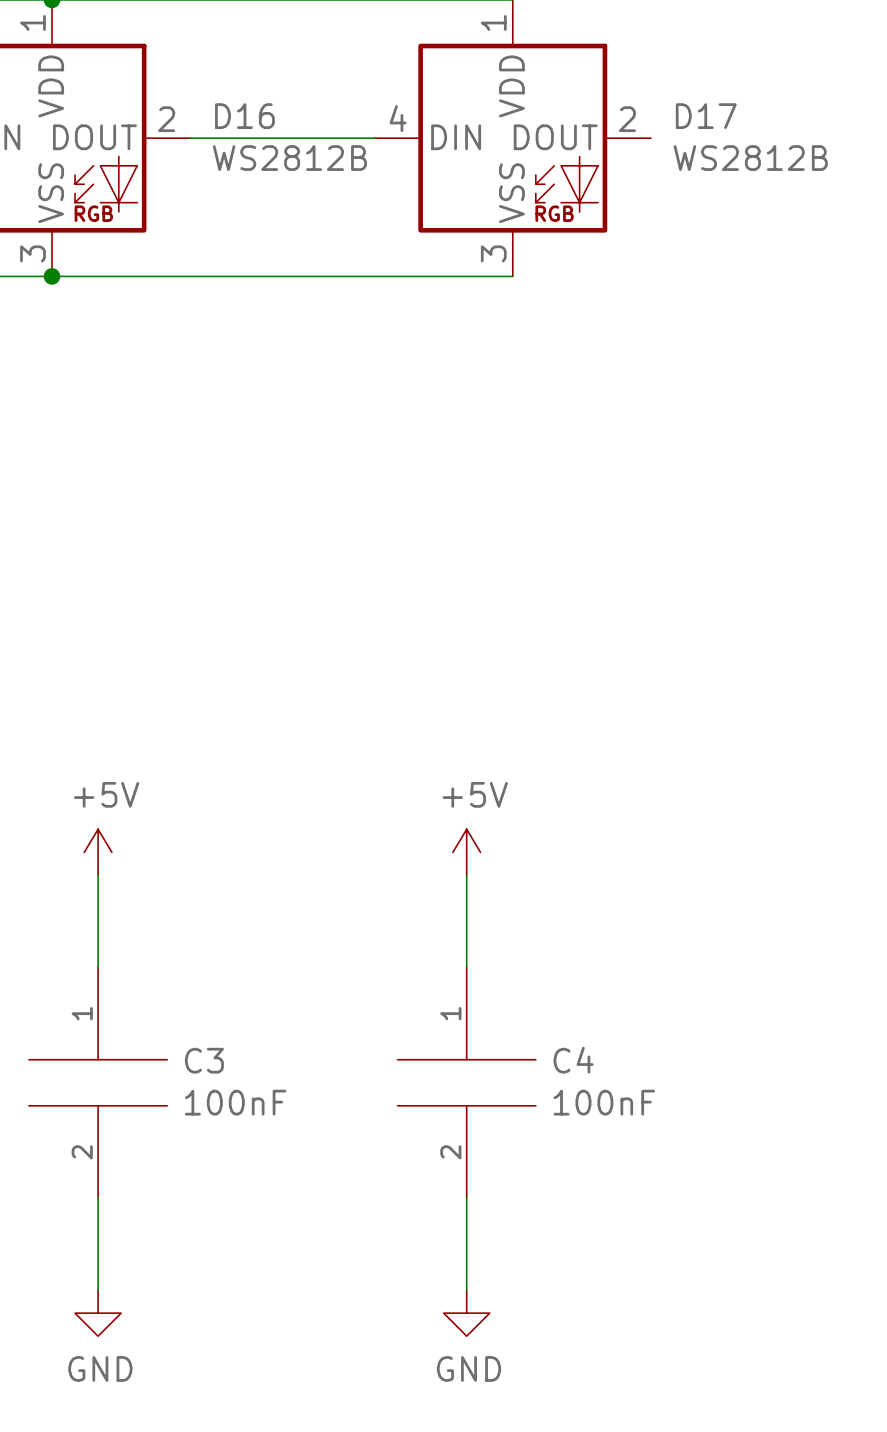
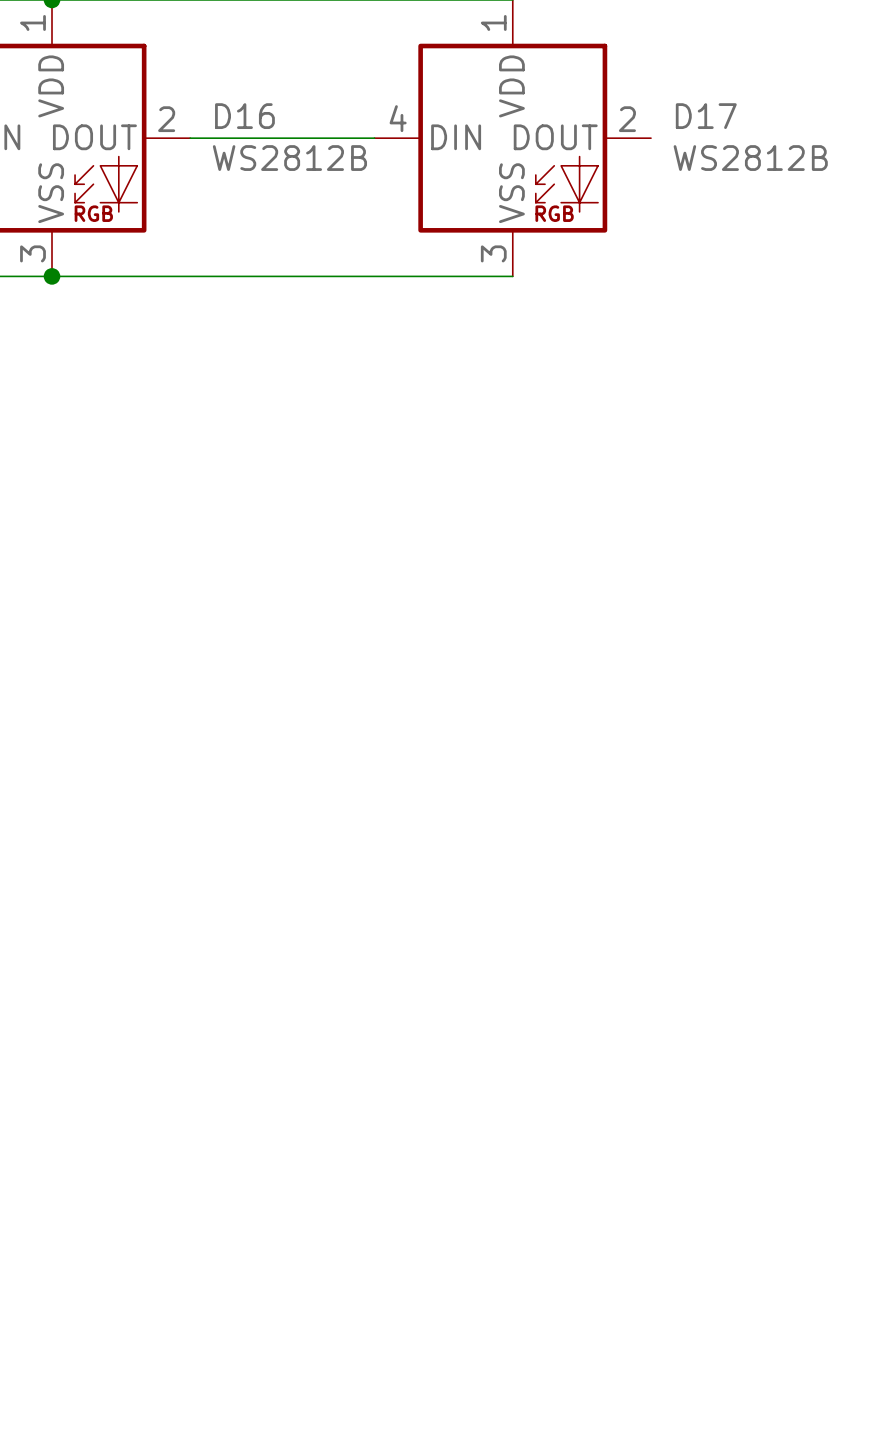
power symbol: +5V (98, 852) -> none
power symbol: +5V (466, 852) -> none
wire: (98, 875) (98, 967) -> none
wire: (466, 875) (466, 967) -> none
C3: 100nF (98, 1082) -> none
C4: 100nF (466, 1082) -> none
wire: (98, 1197) (98, 1290) -> none
wire: (466, 1197) (466, 1290) -> none
power symbol: GND (98, 1313) -> none
power symbol: GND (466, 1313) -> none

